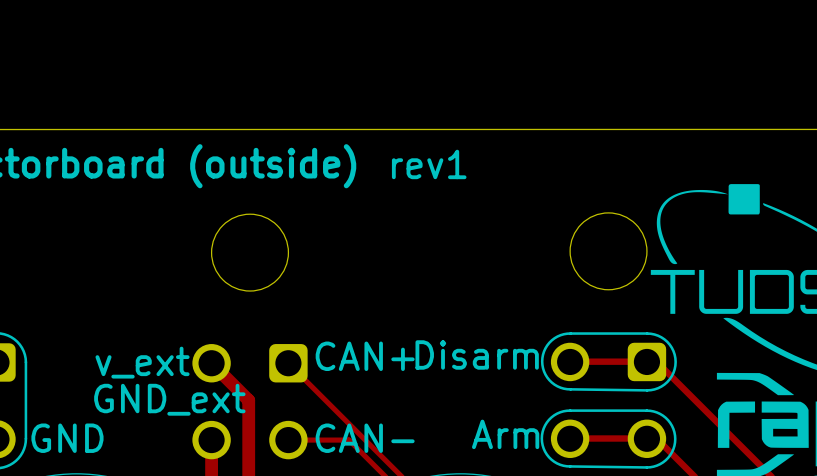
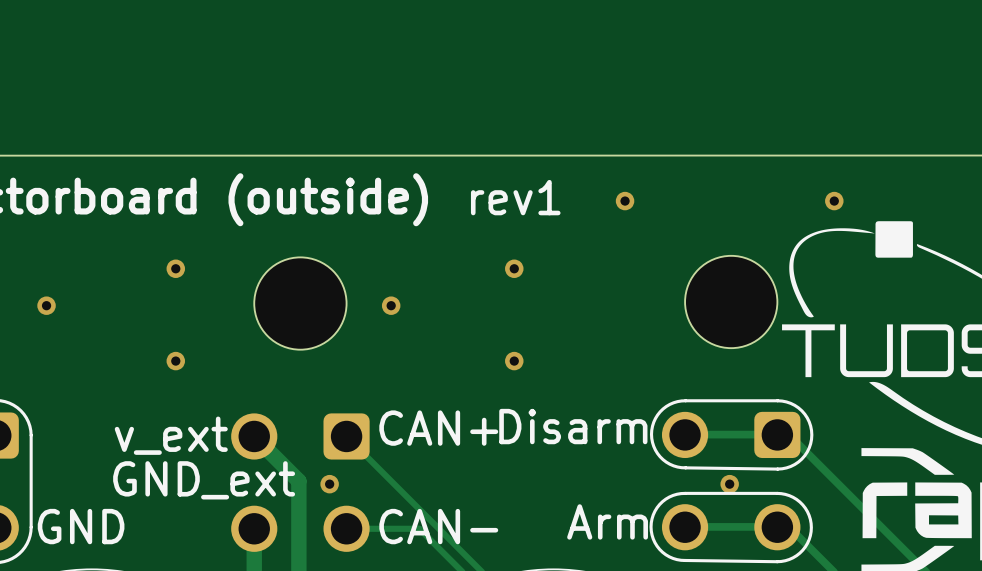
via: none -> (625, 201)
via: none -> (834, 201)
via: none -> (175, 268)
via: none -> (514, 268)
via: none -> (46, 305)
via: none -> (391, 305)
via: none -> (175, 361)
via: none -> (514, 361)
via: none -> (329, 484)
via: none -> (729, 484)

